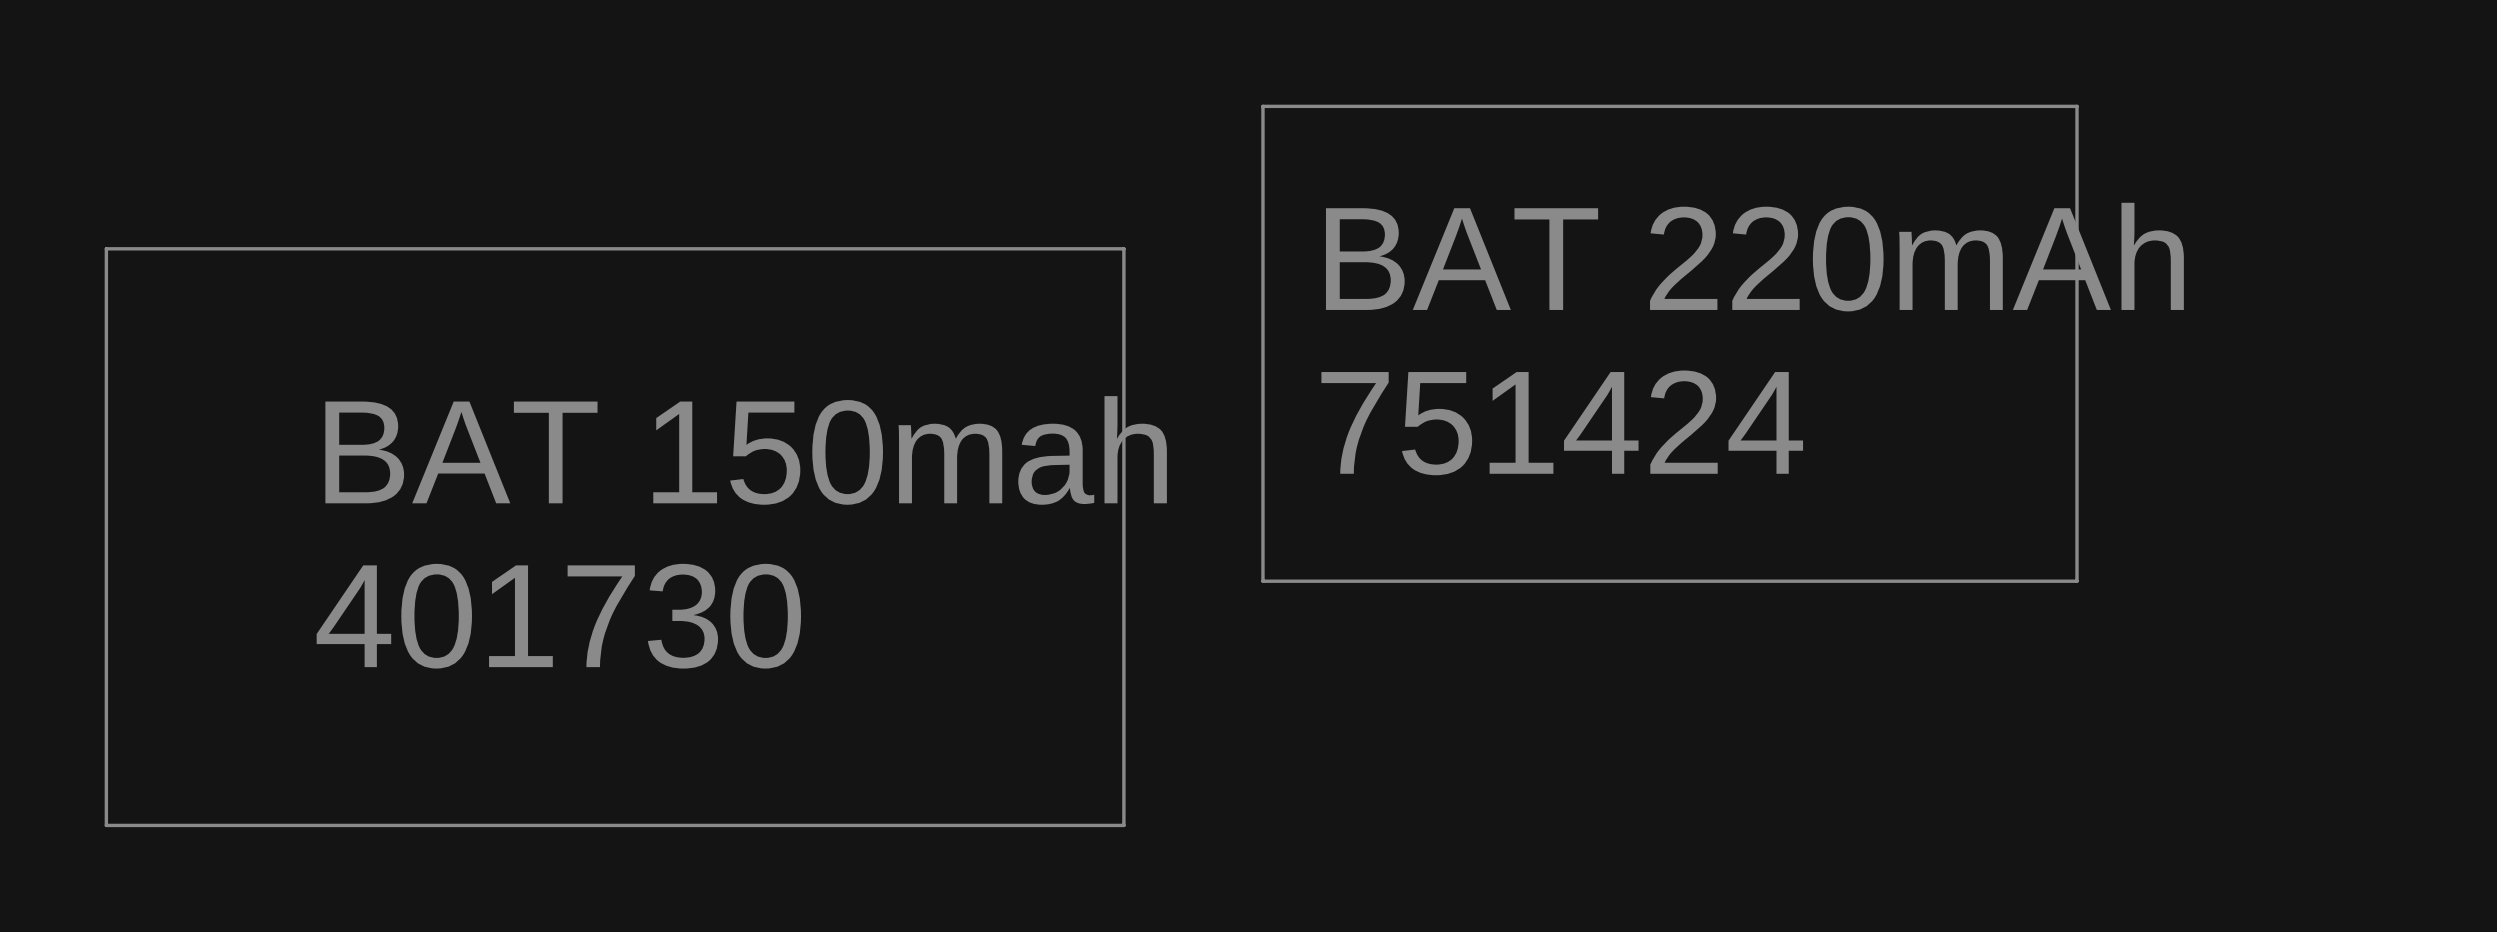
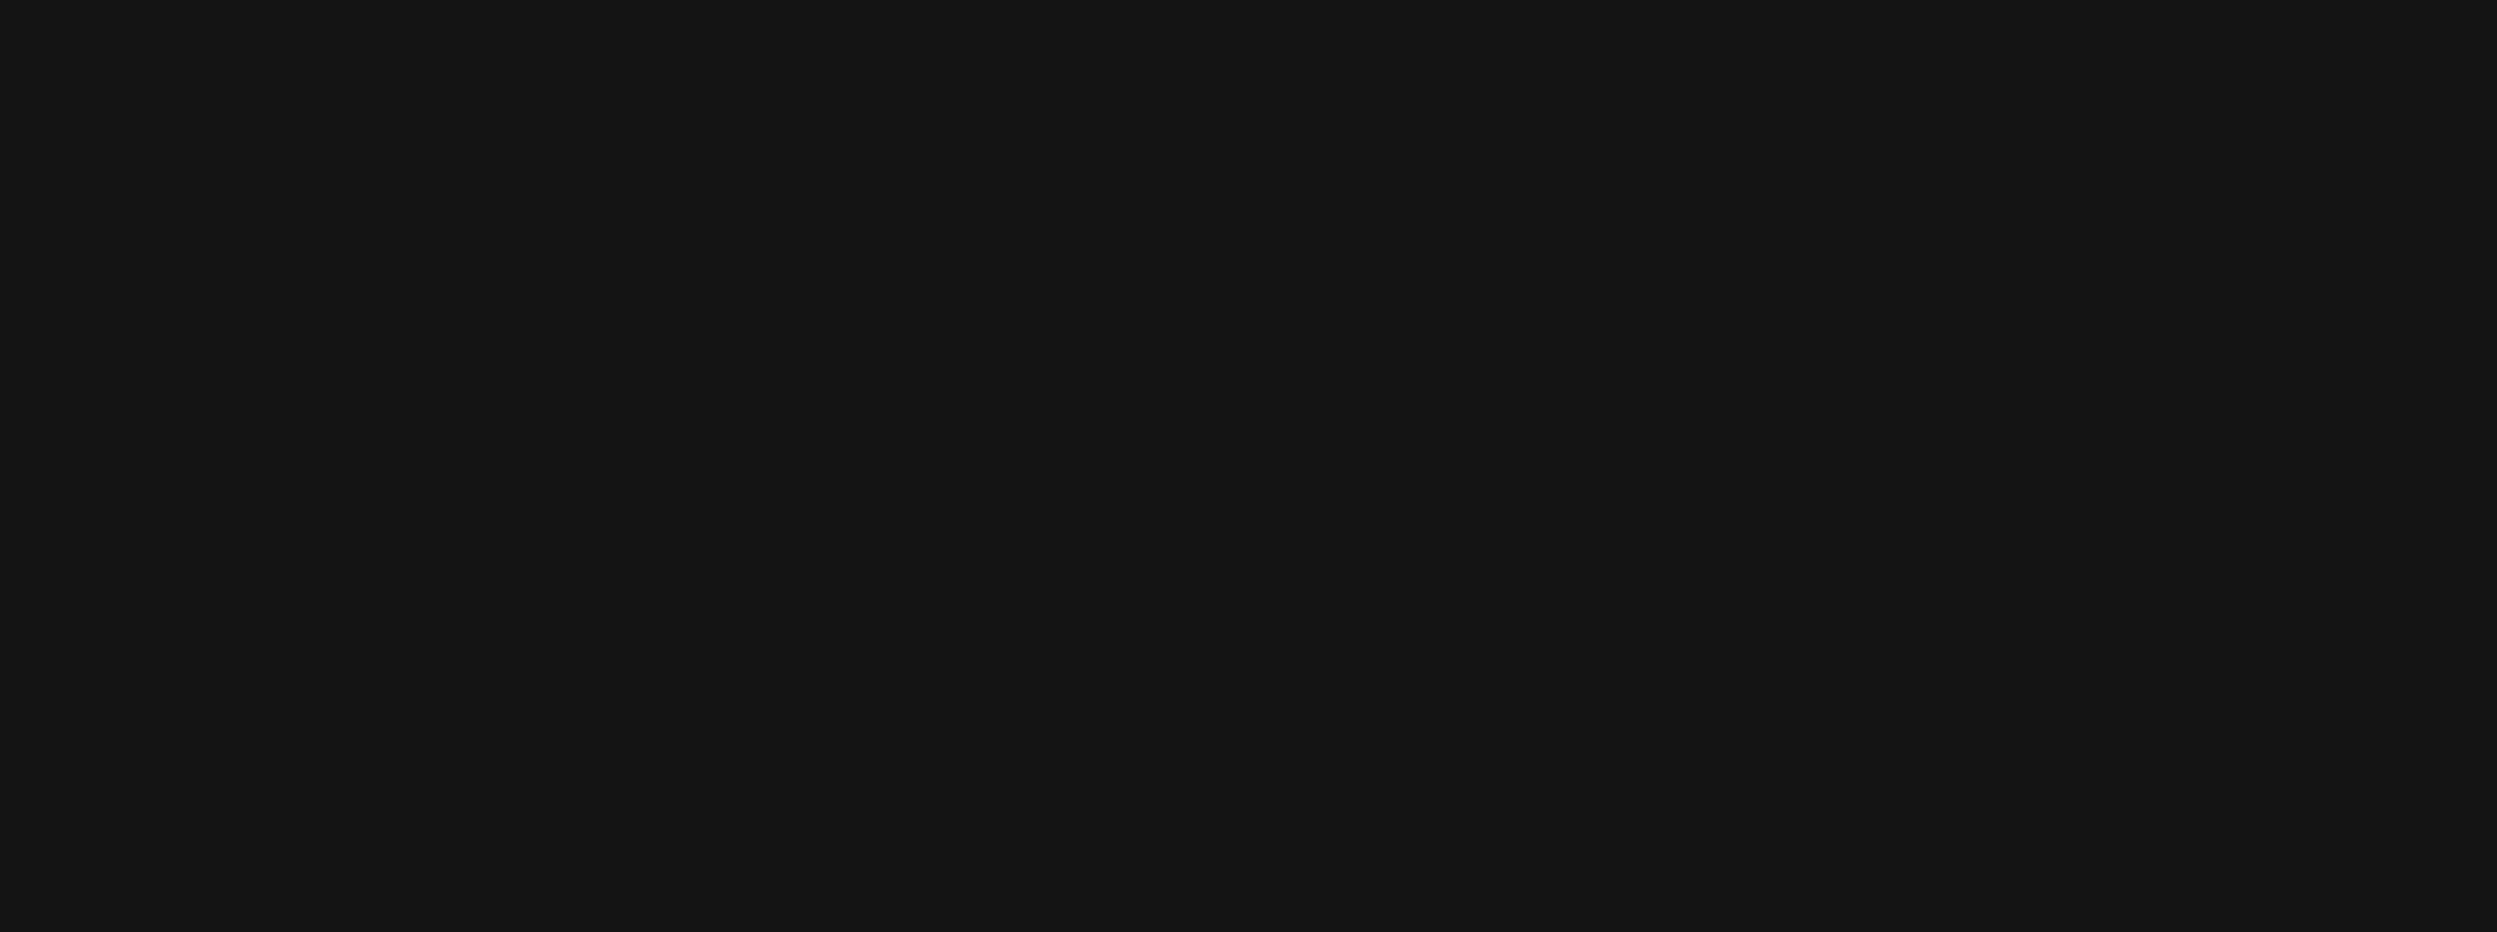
line: (1262, 106) (2077, 106) (2077, 581) (1262, 581) (1262, 106) -> none
line: (106, 248) (1123, 248) (1123, 825) (106, 825) (106, 248) -> none
text: BAT 220mAh (1754, 257) -> none
text: 751424 (1562, 422) -> none
text: BAT 150mah (746, 450) -> none
text: 401730 (558, 616) -> none

